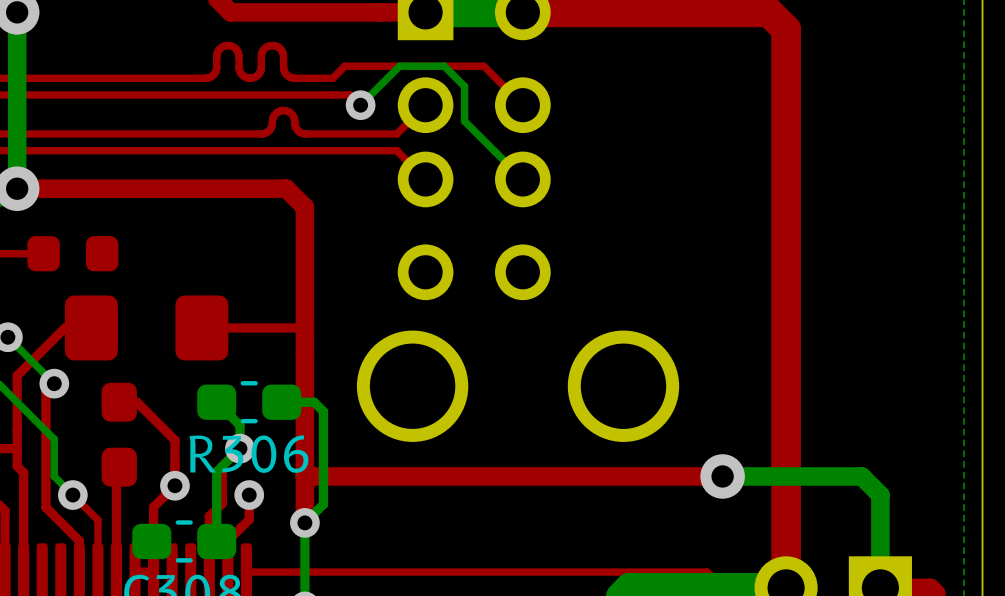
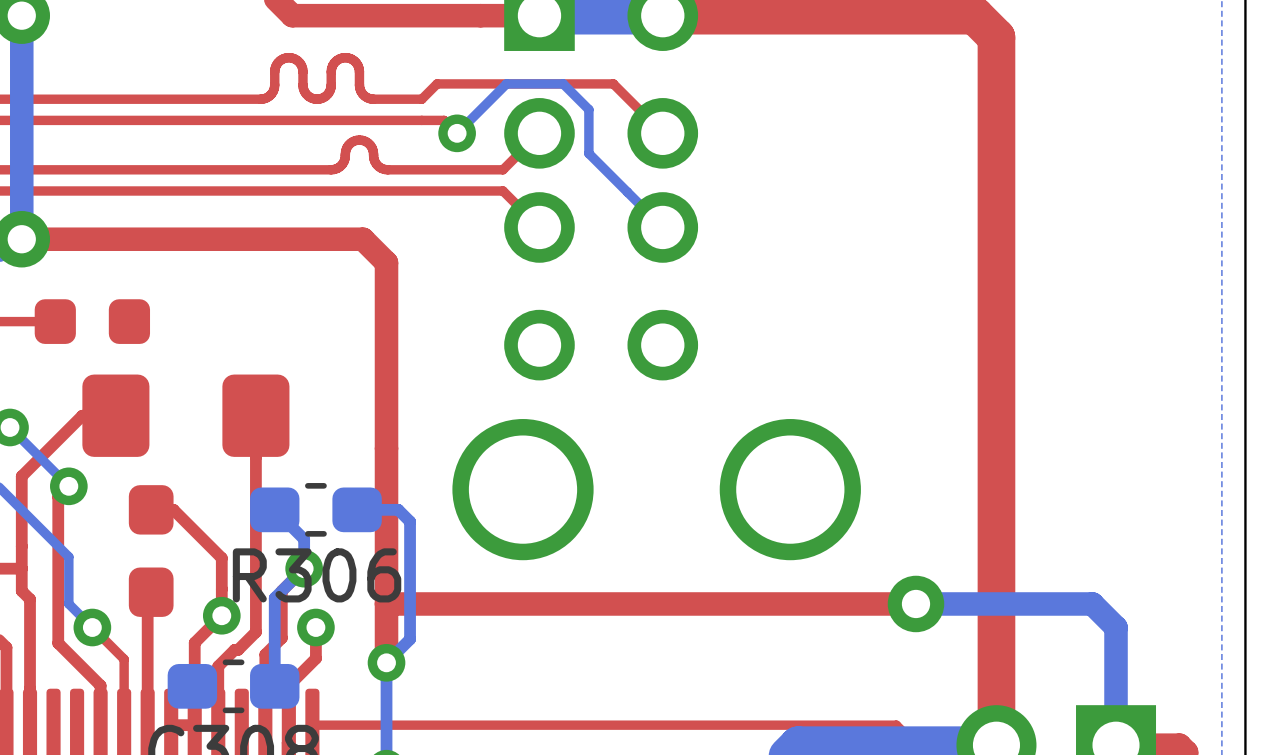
top track: (304, 327) (201, 327) -> (218, 725) (218, 666) (255, 632) (255, 415)

